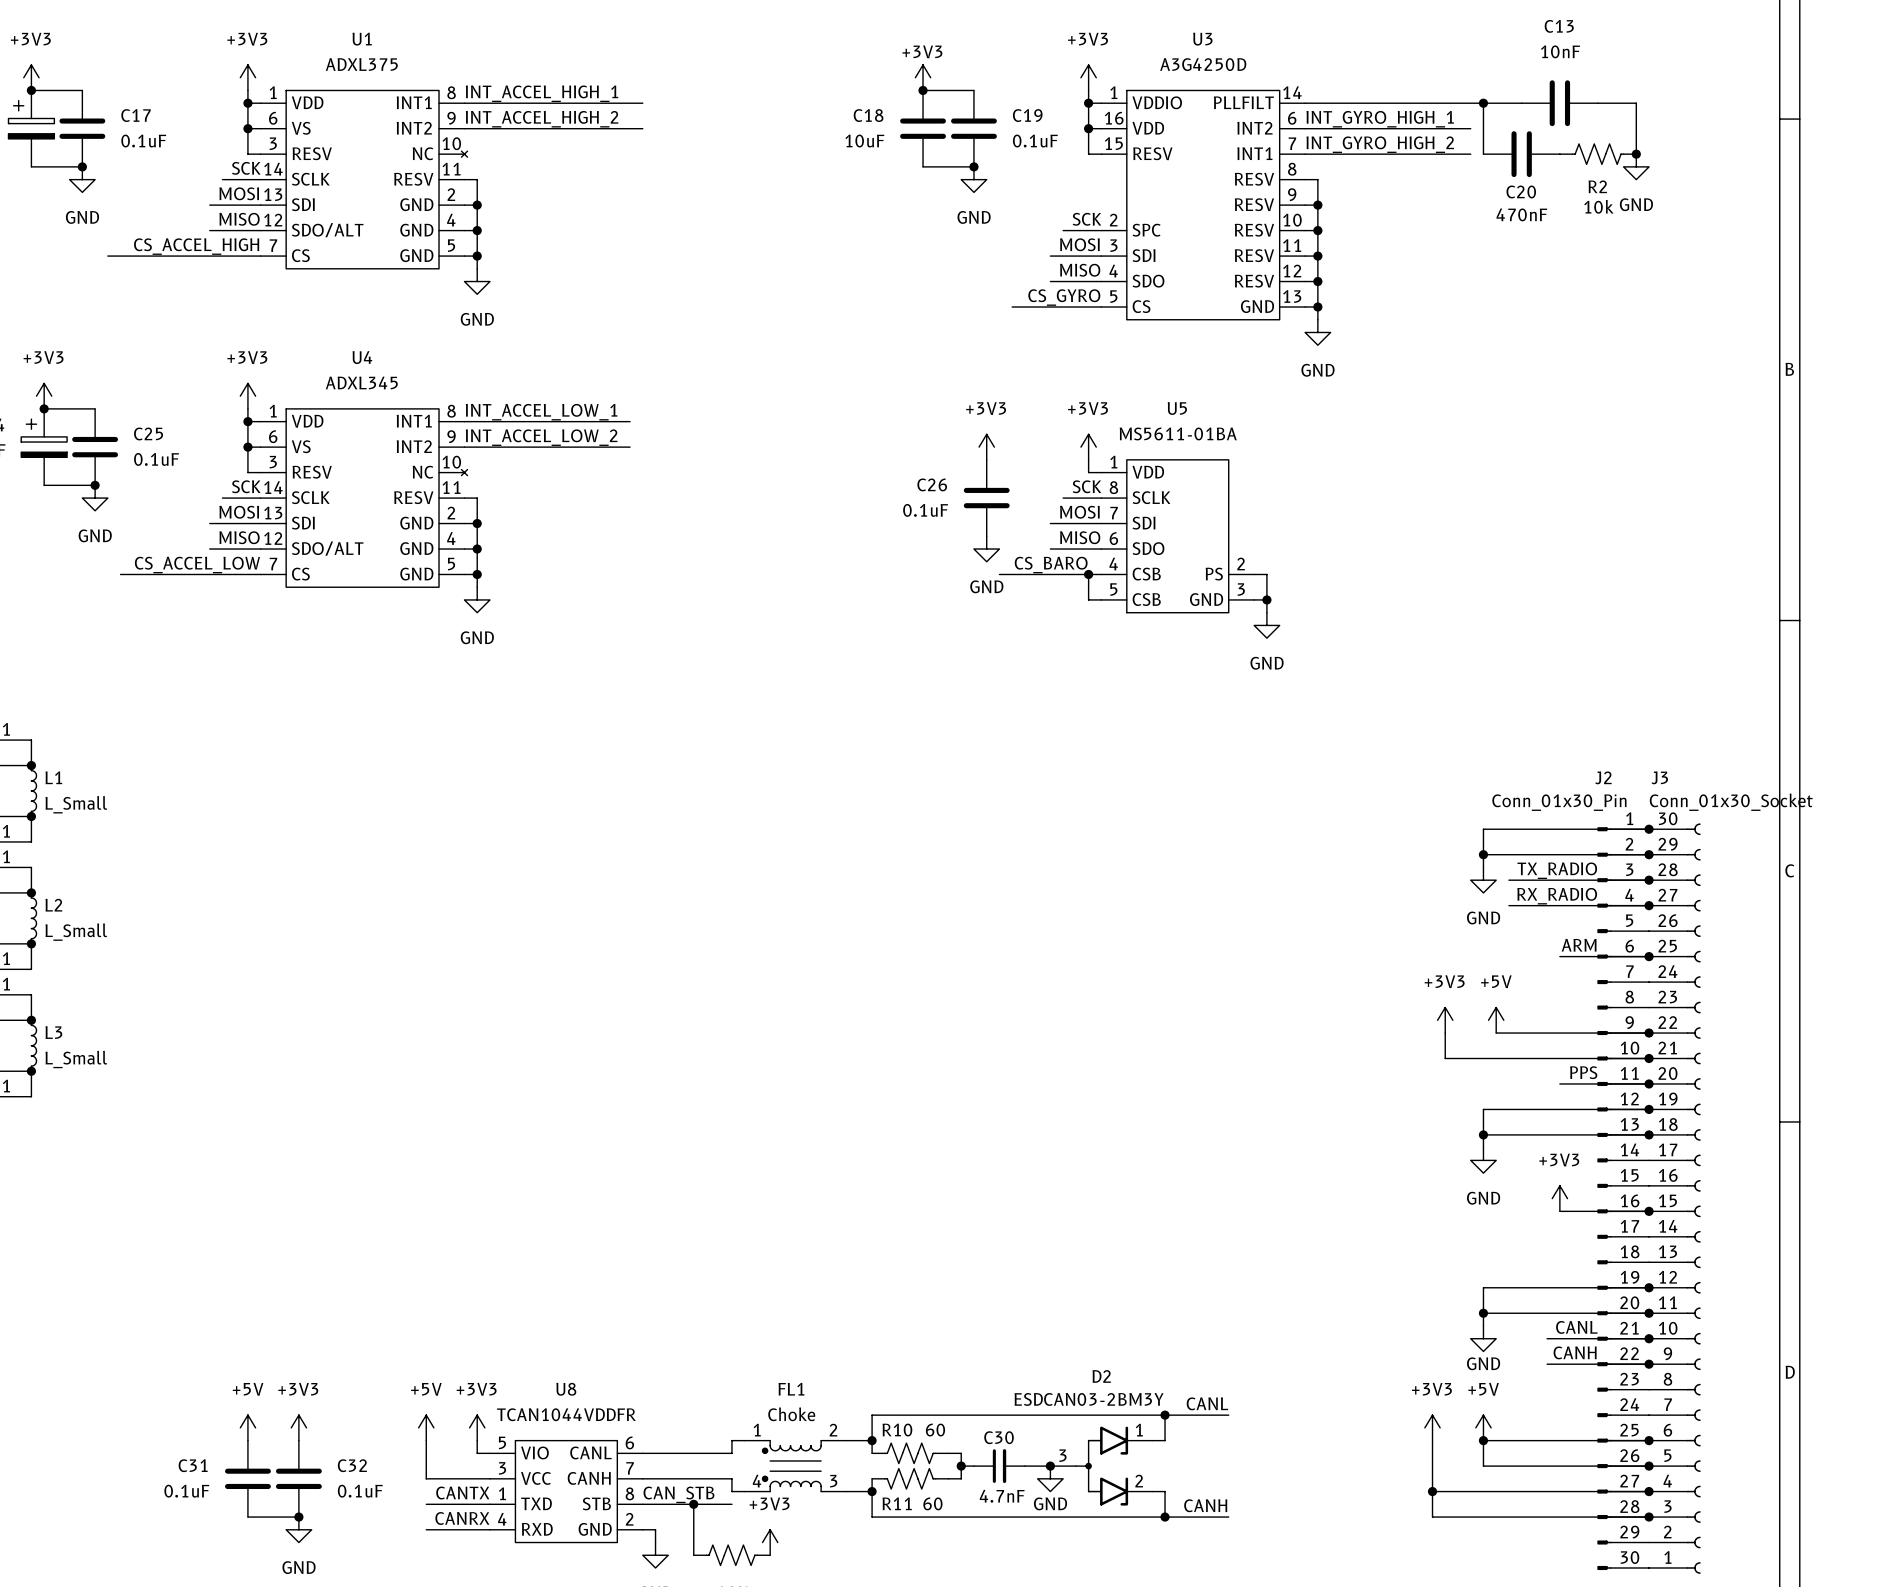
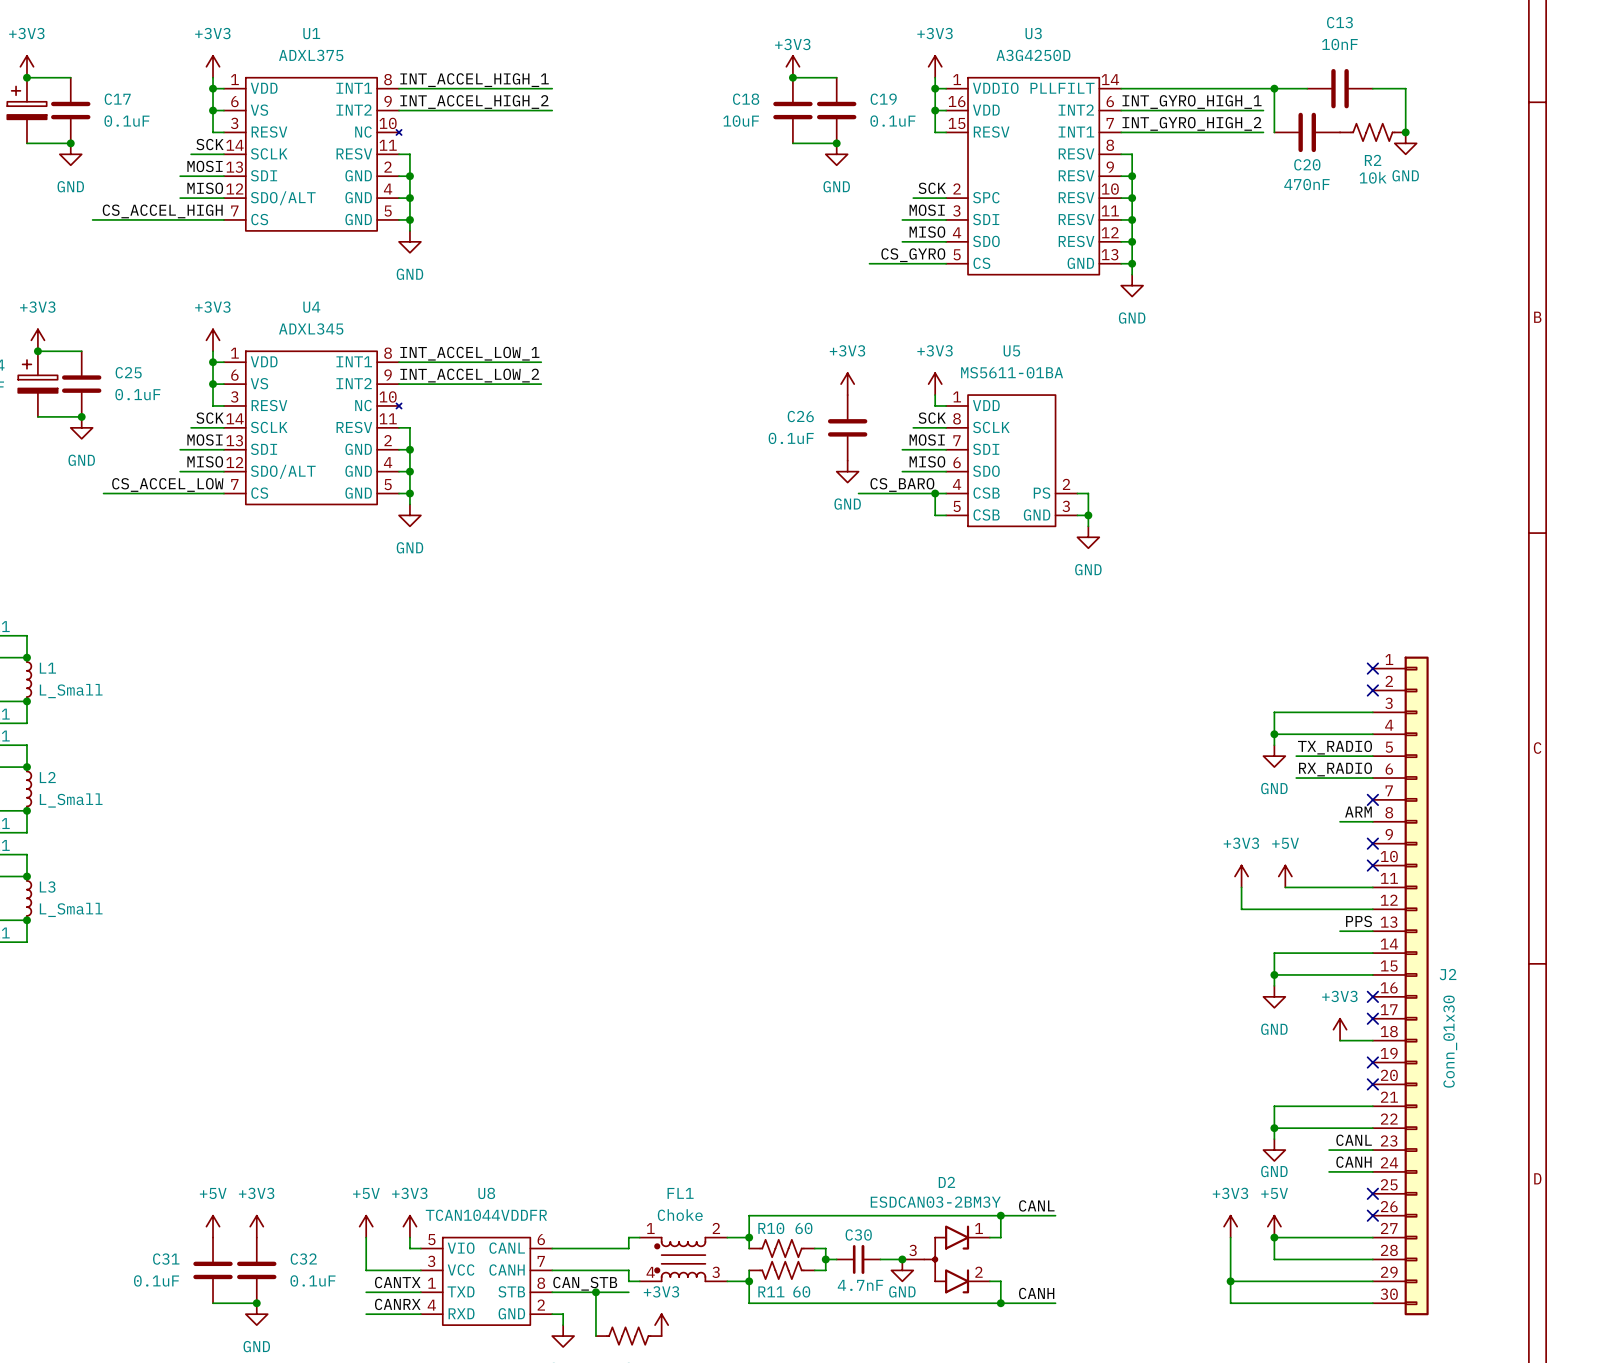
J2 name position: J2 (1603, 777) -> J2 (1448, 974)
no-connect mark: none -> (1372, 668)
J2 value: Conn_01x30_Pin (1559, 802) -> Conn_01x30 (1450, 1041)
no-connect mark: none -> (1372, 690)
J2 symbol: [1597, 827, 1650, 1571] -> [1372, 656, 1429, 1316]
junction: (1649, 829) -> none
junction: (1649, 854) -> none
junction: (1649, 880) -> none
junction: (1649, 905) -> none
no-connect mark: none -> (1372, 799)
junction: (1649, 956) -> none
no-connect mark: none -> (1372, 843)
no-connect mark: none -> (1372, 865)
junction: (1649, 1033) -> none
junction: (1649, 1058) -> none
junction: (1649, 1083) -> none
junction: (1649, 1109) -> none
junction: (1649, 1134) -> none
no-connect mark: none -> (1372, 996)
no-connect mark: none -> (1372, 1018)
J3: Conn_01x30_Socket (1674, 1198) -> none
junction: (1649, 1211) -> none
no-connect mark: none -> (1372, 1062)
no-connect mark: none -> (1372, 1084)
junction: (1649, 1287) -> none
junction: (1649, 1313) -> none
junction: (1649, 1338) -> none
junction: (1649, 1364) -> none
no-connect mark: none -> (1372, 1193)
no-connect mark: none -> (1372, 1215)
junction: (1649, 1440) -> none
junction: (1649, 1466) -> none
junction: (1649, 1491) -> none
junction: (1649, 1517) -> none

